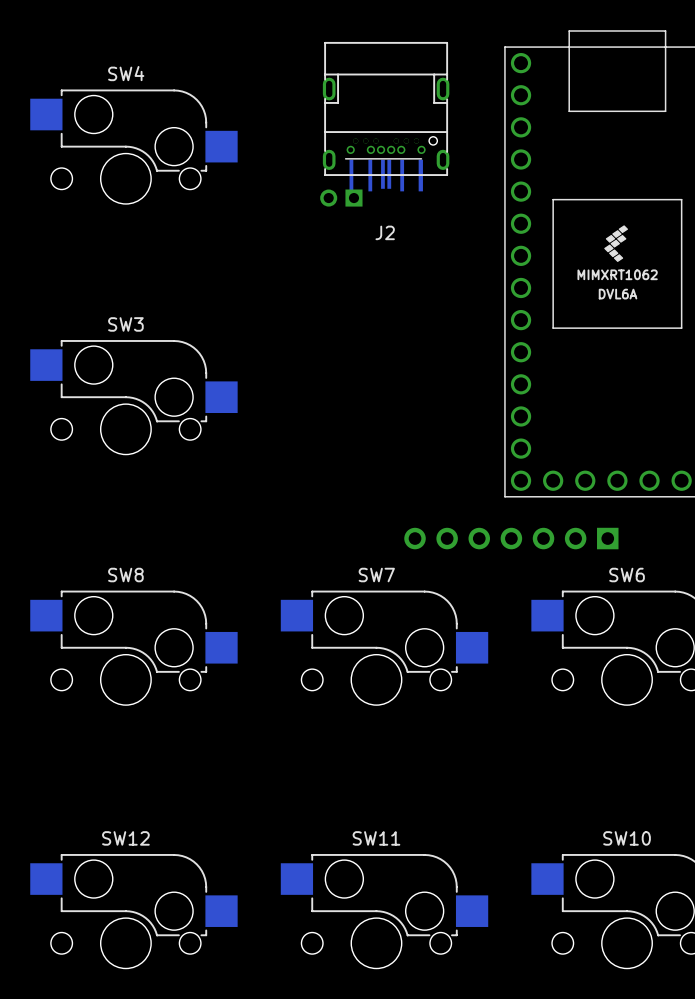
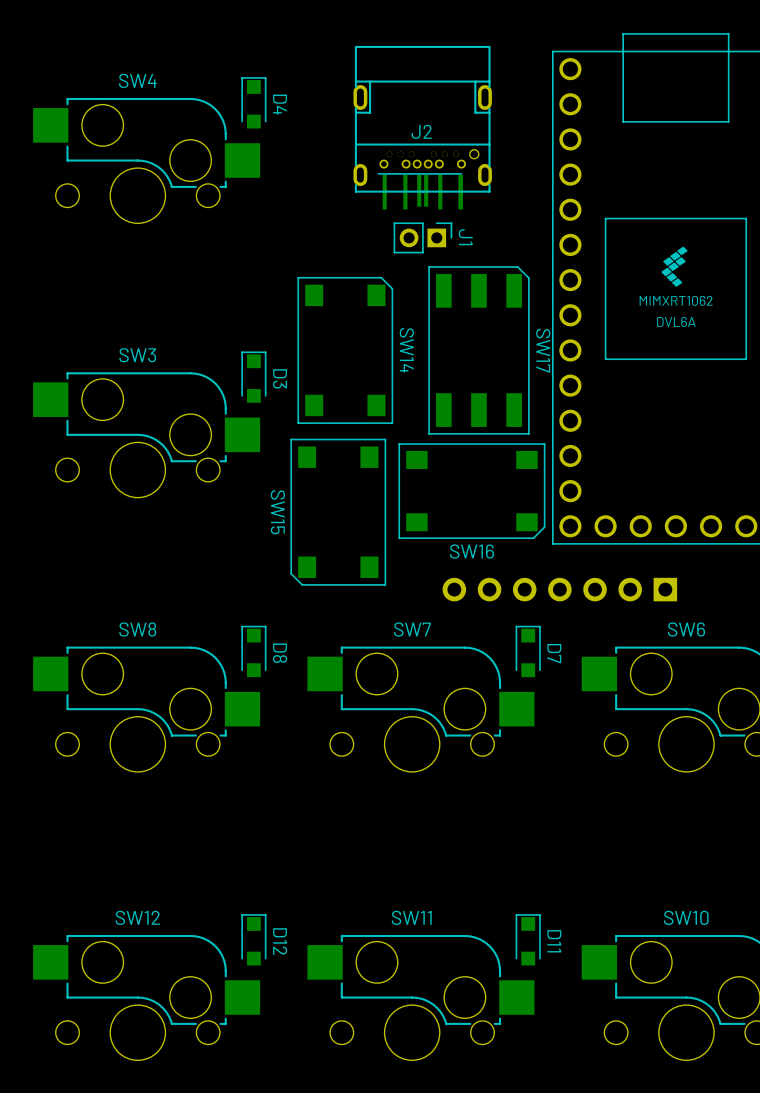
D4: none -> (253, 102)
J1 side: top (341, 198) -> bottom (422, 237)
J2 name position: J2 (385, 232) -> J2 (421, 131)
SW14: none -> (345, 350)
SW17: none -> (478, 350)
D3: none -> (253, 377)
SW16: none -> (471, 491)
SW15: none -> (338, 512)
D8: none -> (253, 651)
D7: none -> (528, 651)
D12: none -> (253, 939)
D11: none -> (528, 939)

